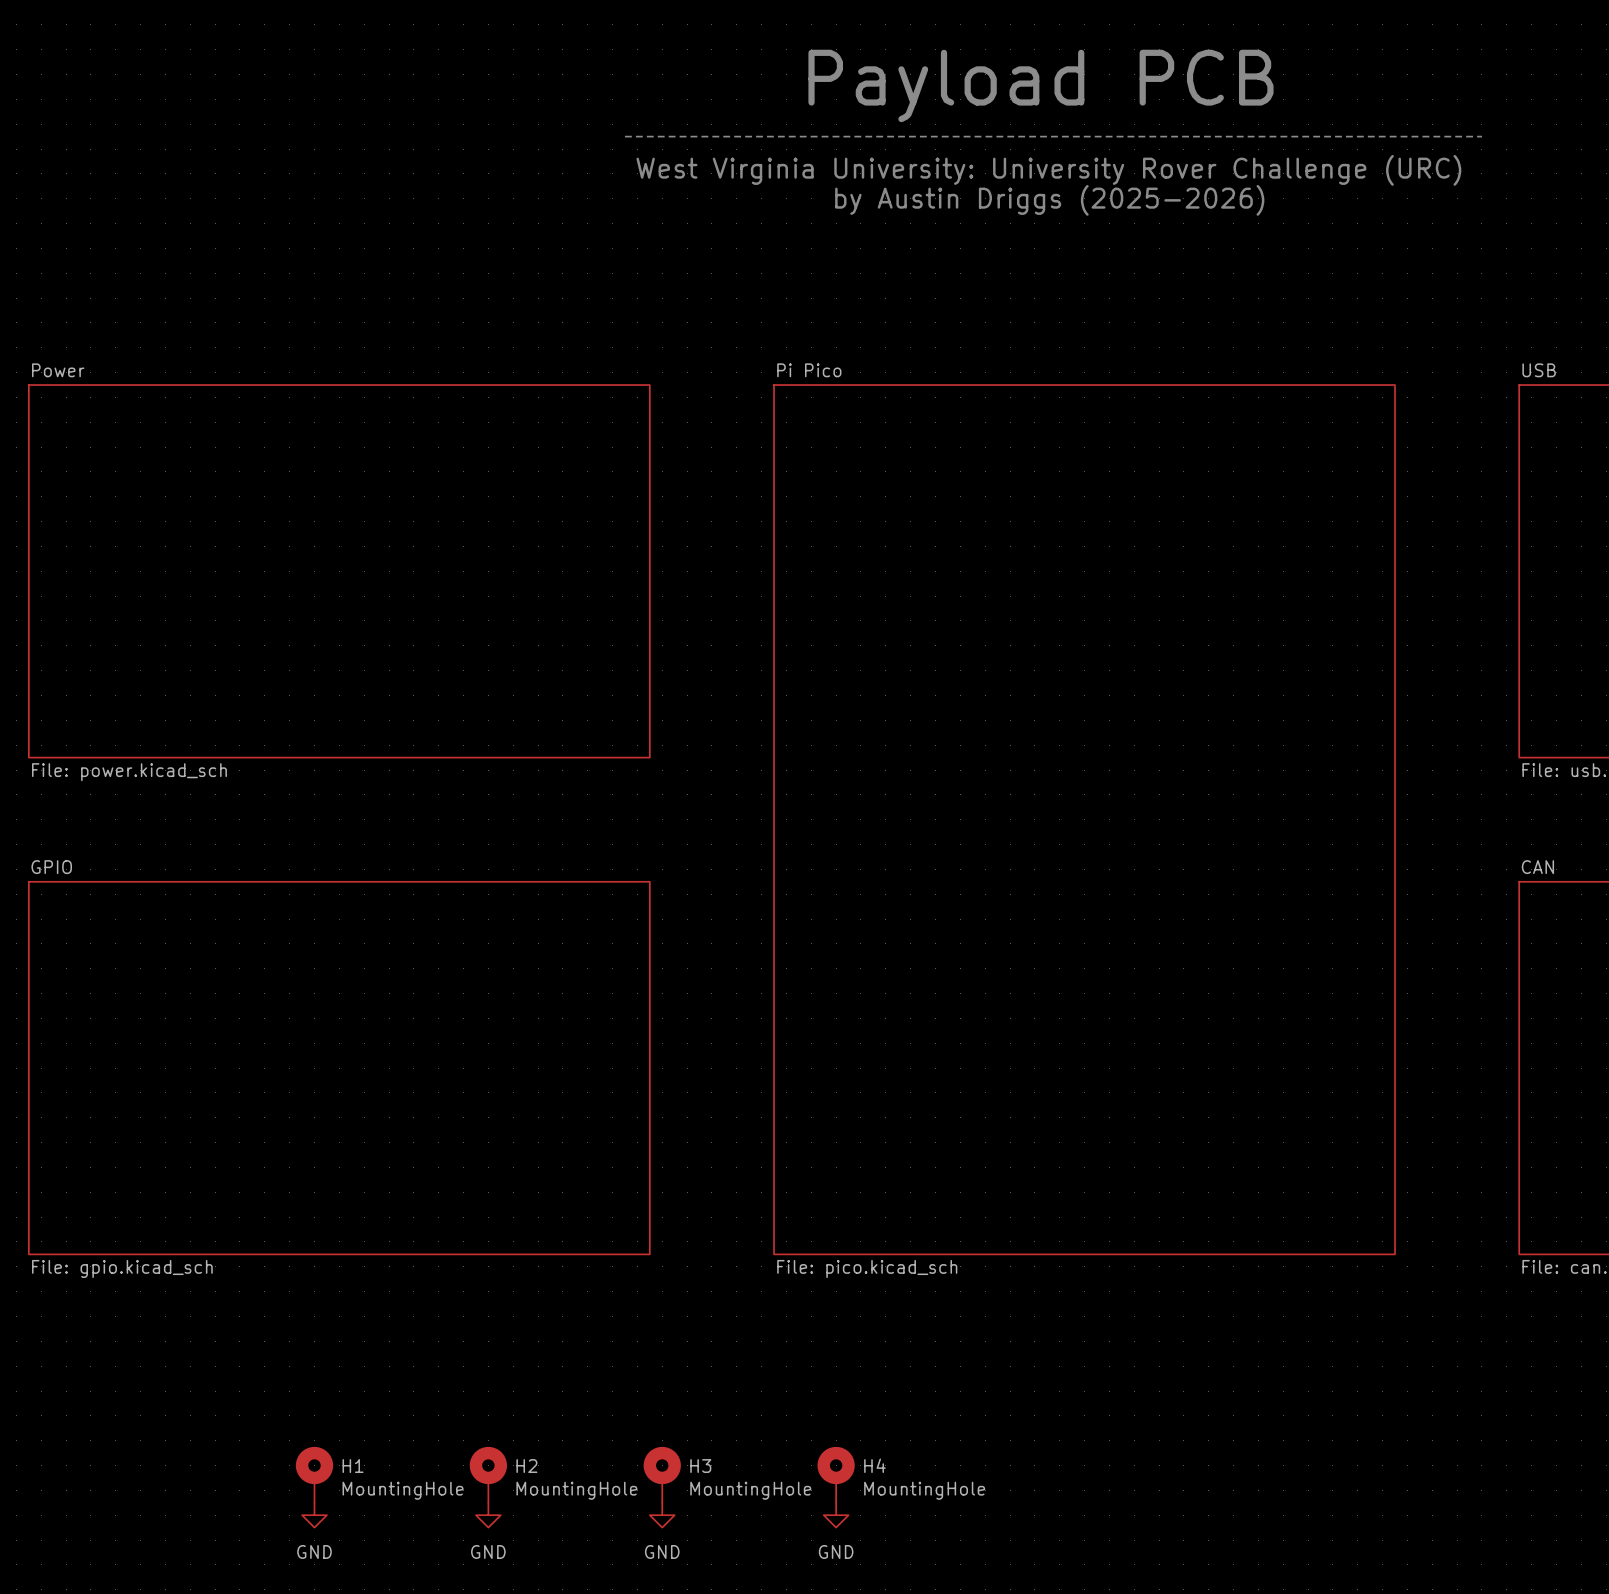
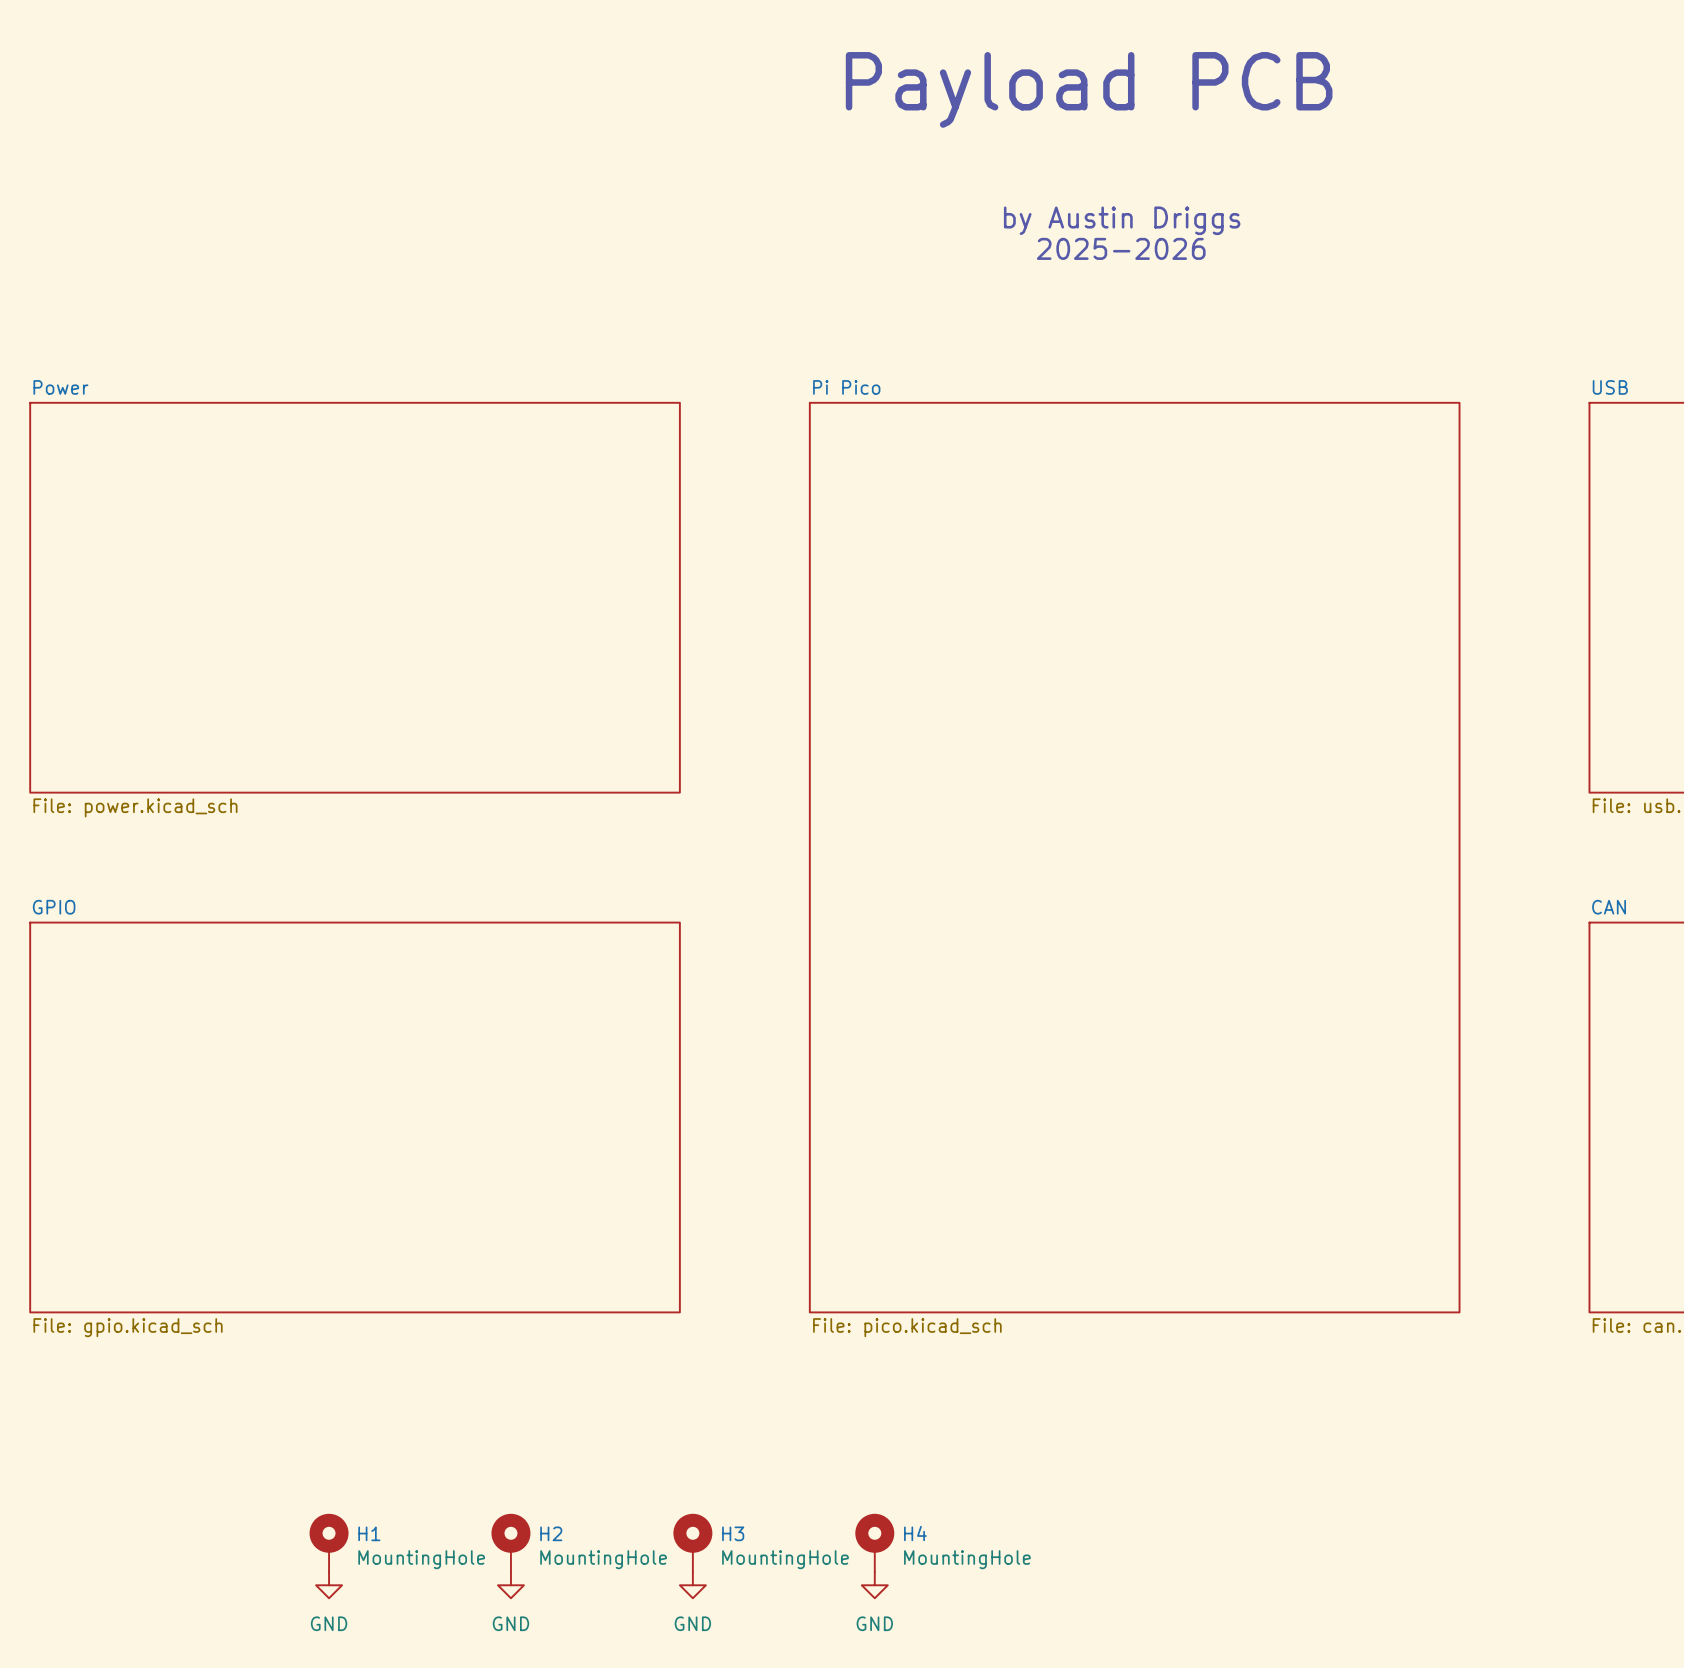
line: (624, 136) (1481, 136) -> none
text: West Virginia University: University Rover Challenge (URC) (1048, 170) -> none
text: by Austin Driggs (2025-2026) (1049, 200) -> by Austin Driggs (1122, 220)
text: none -> 2025-2026 (1121, 248)

